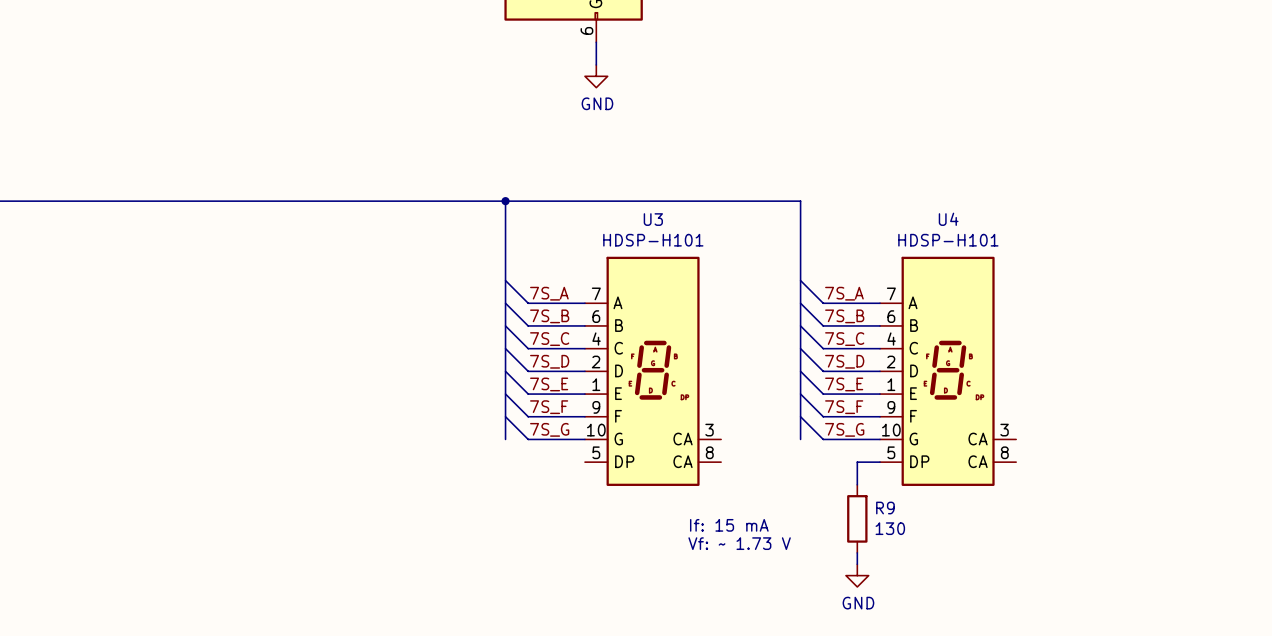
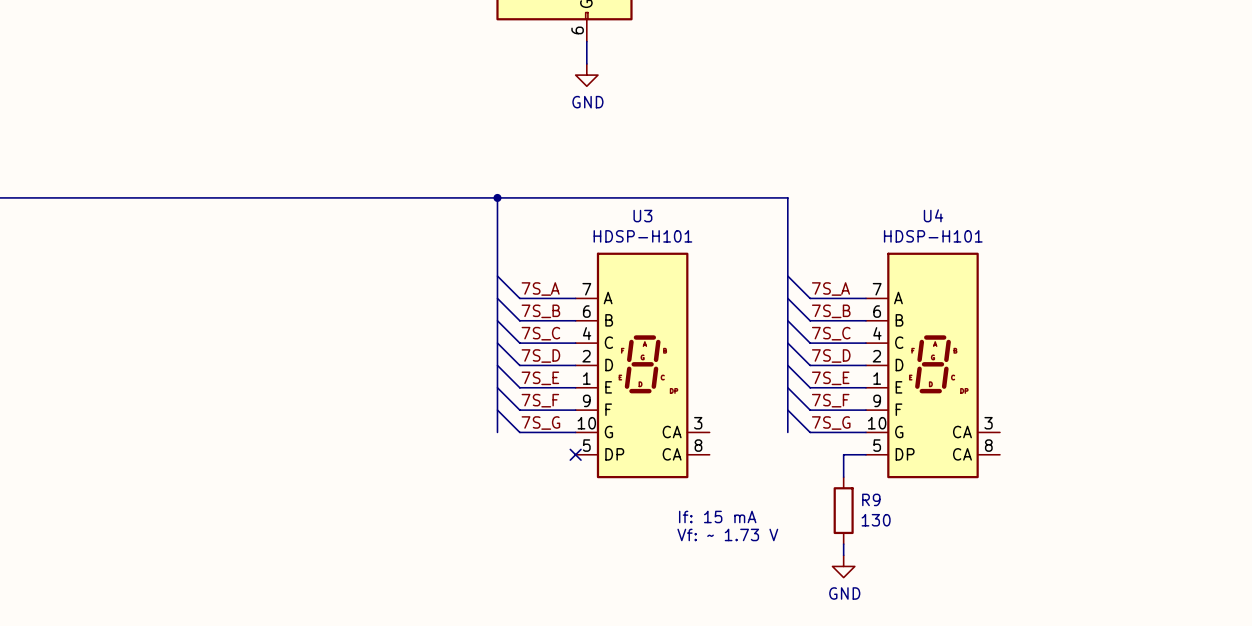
no-connect mark: none -> (575, 454)

